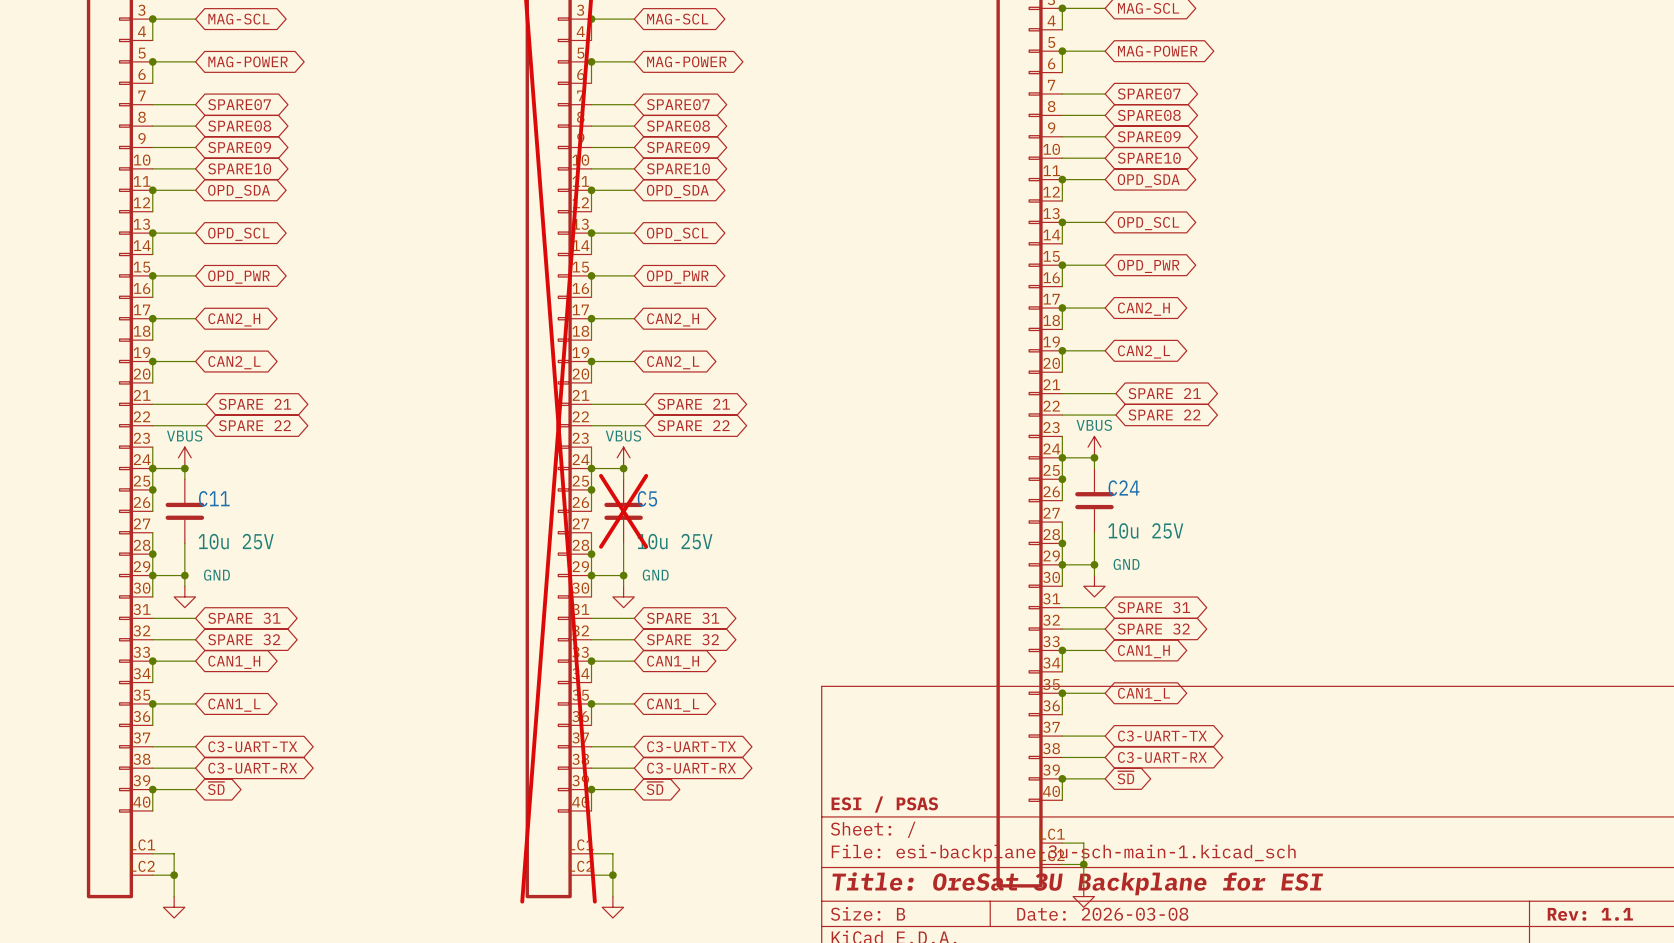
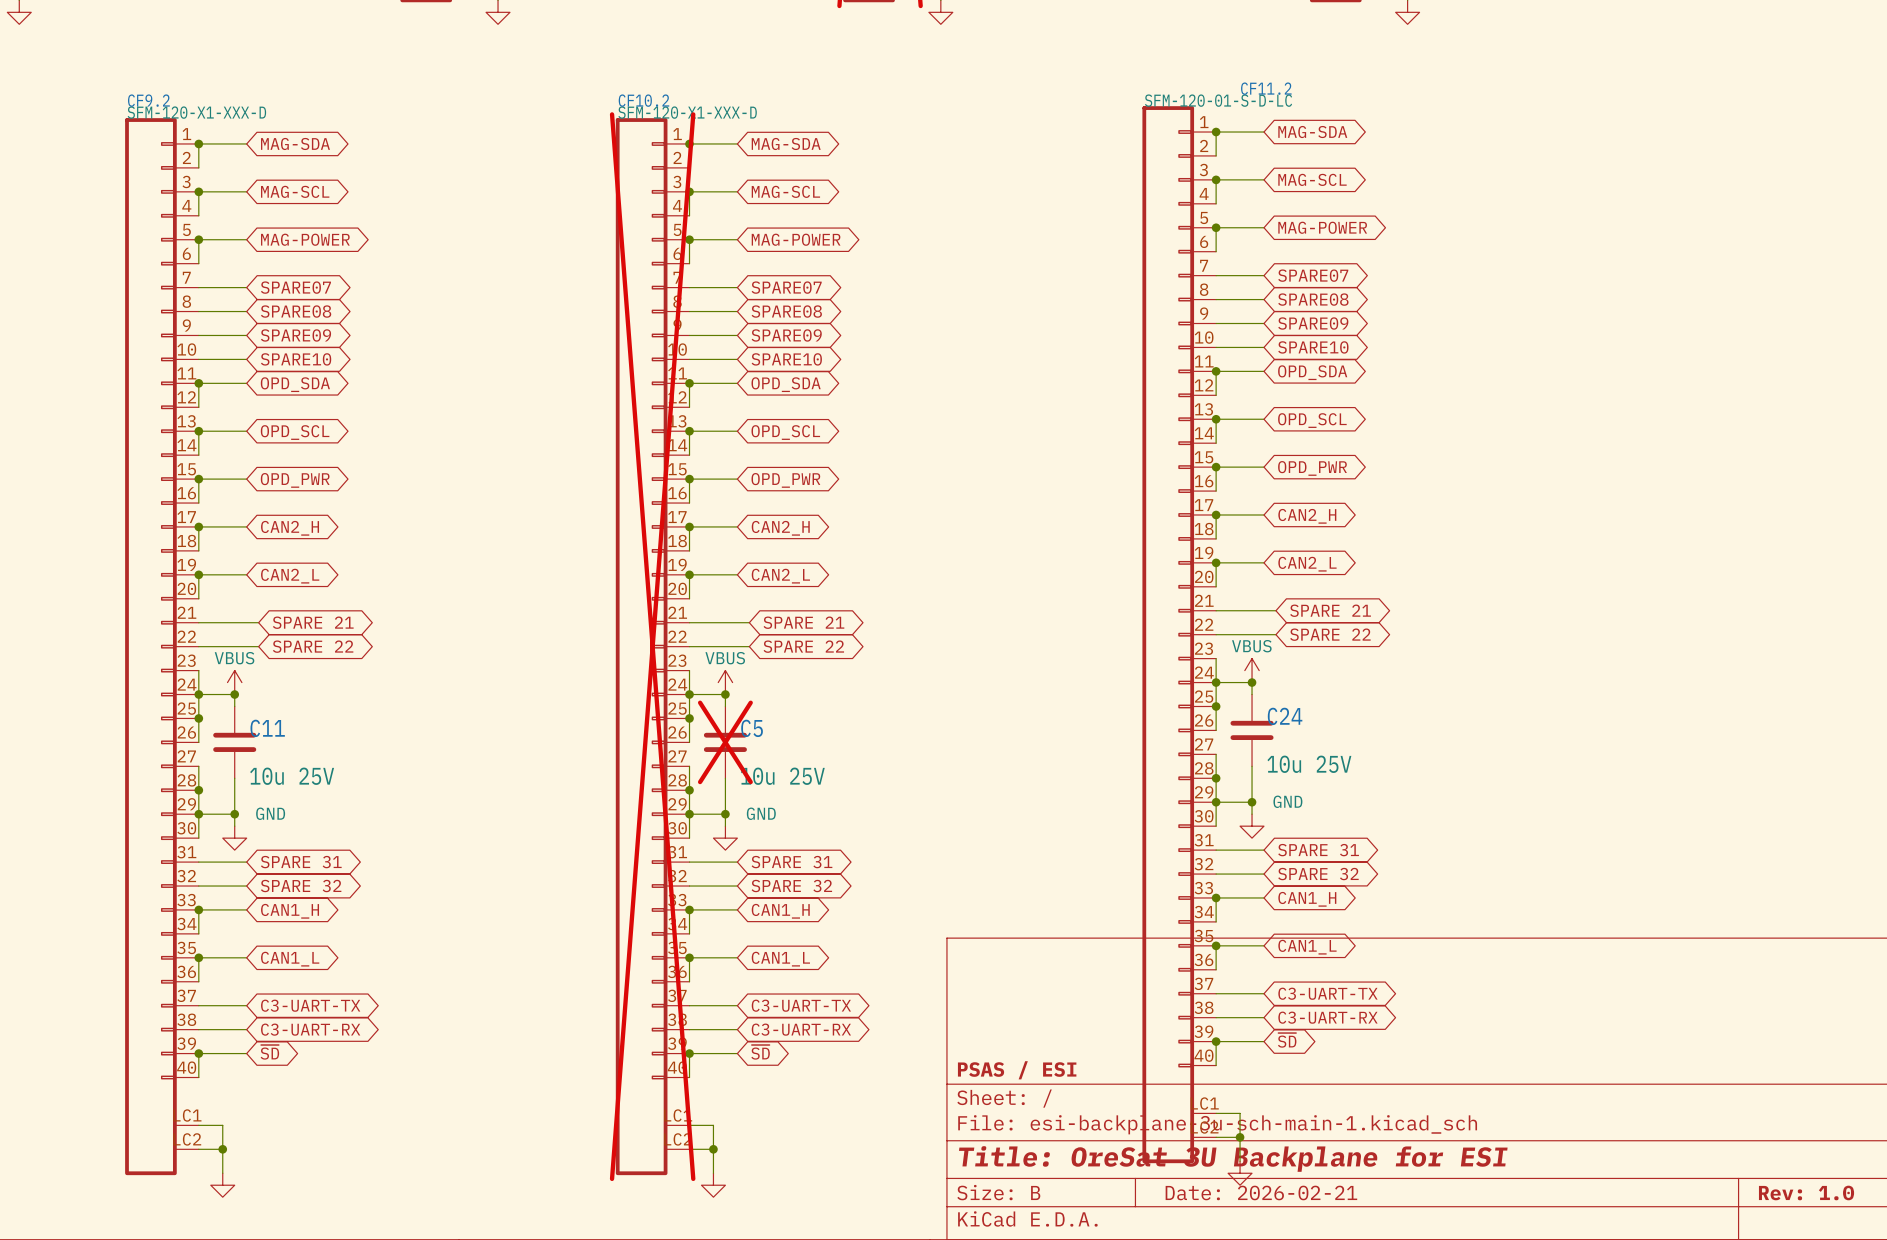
title block: ESI / PSAS (884, 804) -> PSAS / ESI (1017, 1070)
title block: Date: 2026-03-08 (1102, 914) -> Date: 2026-02-21 (1261, 1192)
title block: Rev: 1.1 (1590, 914) -> Rev: 1.0 (1806, 1192)

